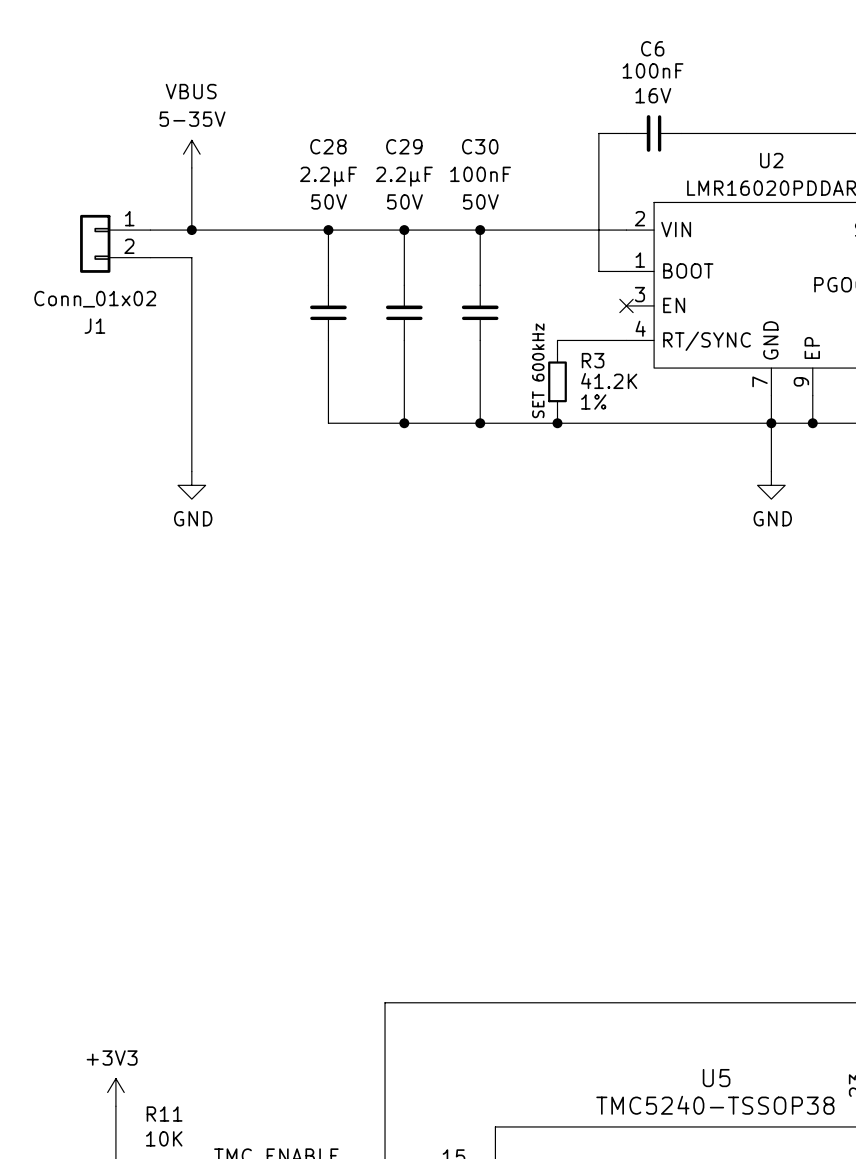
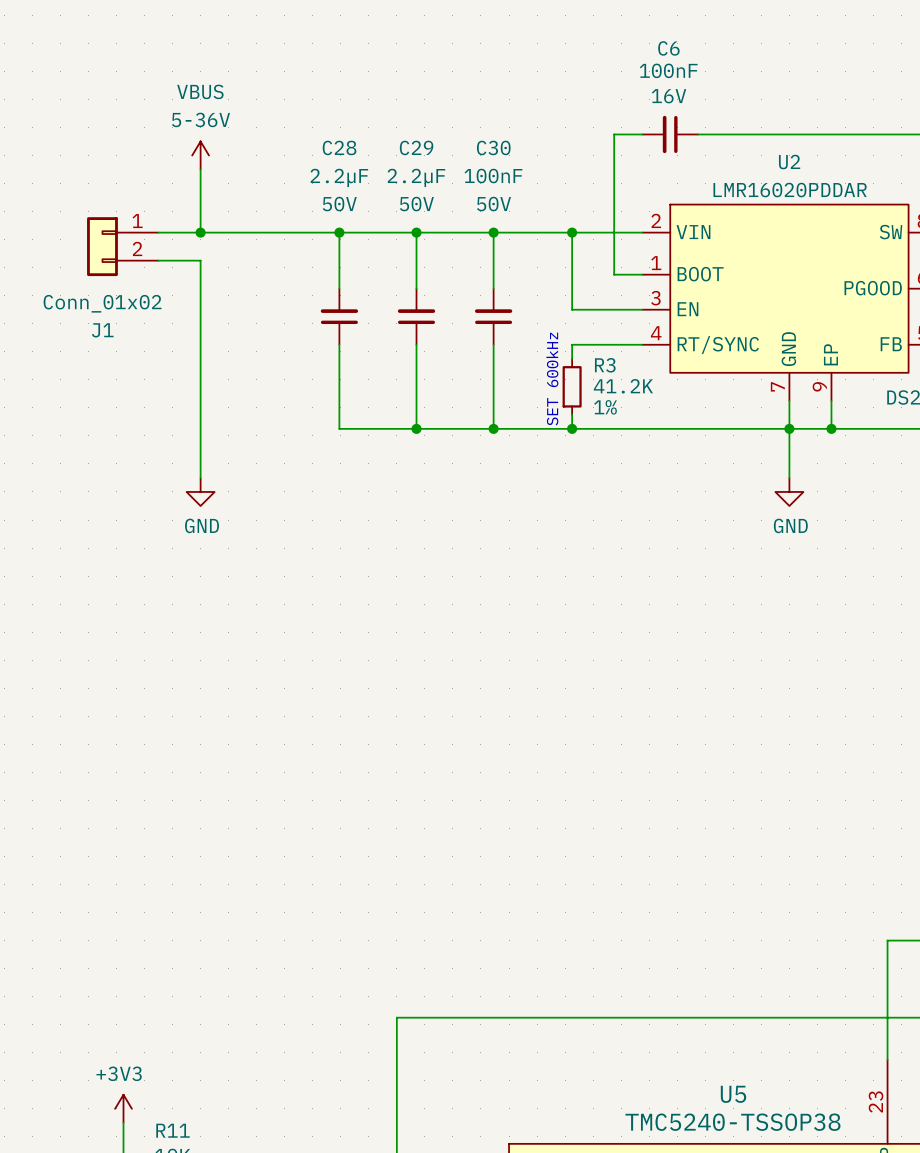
power symbol text: 5-35V (192, 119) -> 5-36V (200, 119)
wire: none -> (572, 232) (572, 309) (642, 309)
junction: none -> (572, 232)
no-connect mark: (626, 305) -> none

